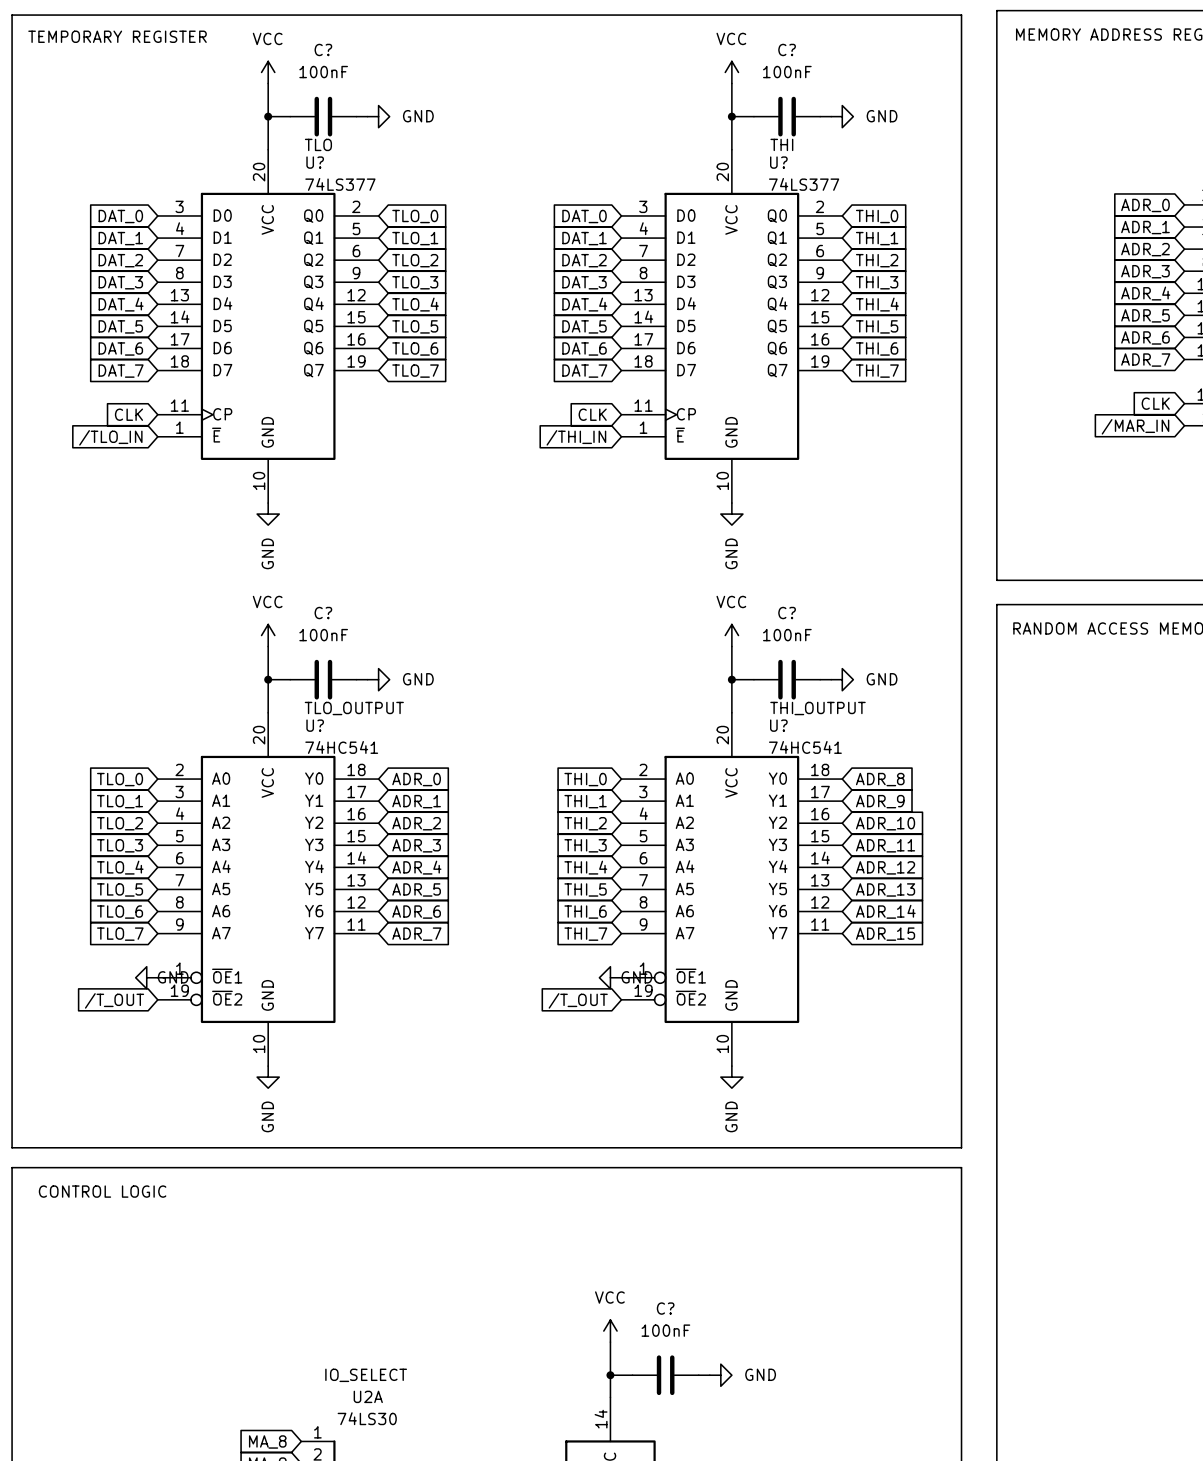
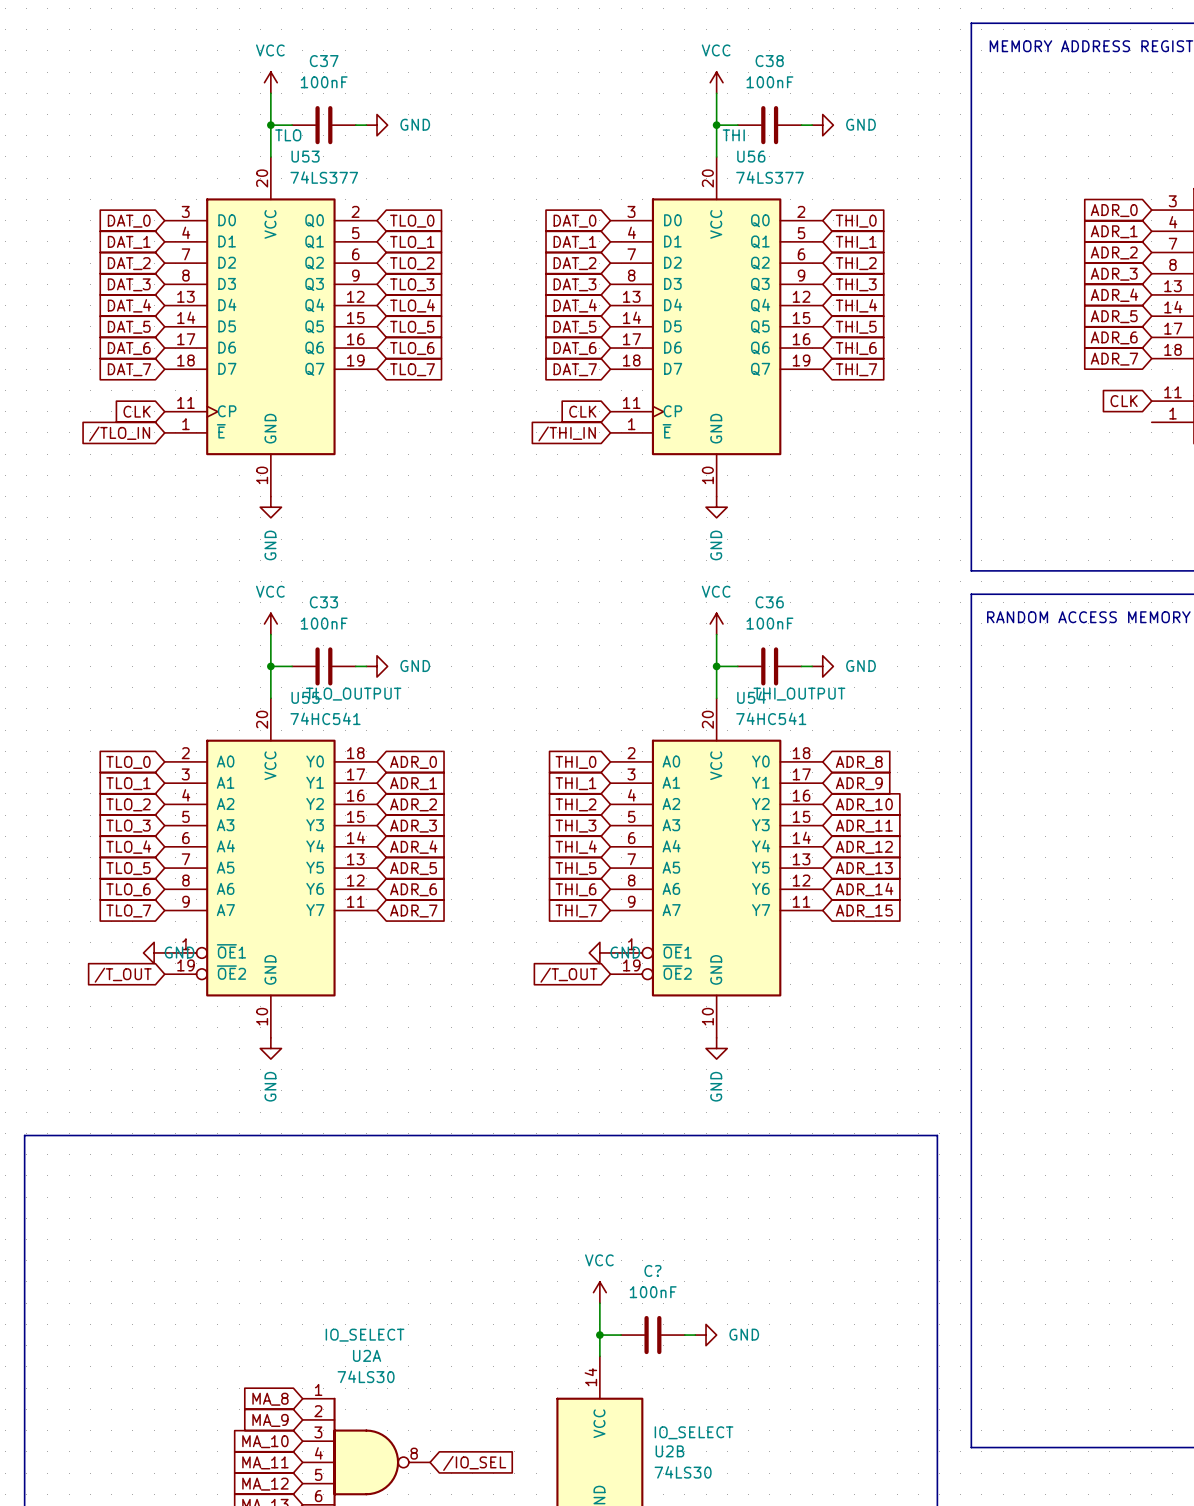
line: (12, 15) (961, 15) (961, 1147) (12, 1147) (12, 15) -> none
text: TEMPORARY REGISTER (117, 36) -> none
C? name: C? (323, 49) -> C37 (324, 61)
C? name: C? (787, 49) -> C38 (769, 61)
U? text position: TLO (318, 144) -> TLO (288, 135)
U? text position: THI (781, 144) -> THI (733, 135)
U? name: U? (315, 162) -> U53 (305, 156)
U? name: U? (778, 162) -> U56 (751, 156)
U? value position: 74LS377 (340, 184) -> 74LS377 (324, 177)
U? value position: 74LS377 (804, 184) -> 74LS377 (769, 177)
global label: /MAR_IN (1135, 426) -> none
C? name: C? (323, 613) -> C33 (323, 602)
C? name: C? (787, 613) -> C36 (769, 602)
U? name: U? (315, 725) -> U55 (305, 697)
U? name: U? (778, 725) -> U54 (751, 697)
U? value position: 74HC541 (341, 747) -> 74HC541 (325, 718)
U? value position: 74HC541 (805, 747) -> 74HC541 (771, 718)
text: CONTROL LOGIC (102, 1191) -> none

